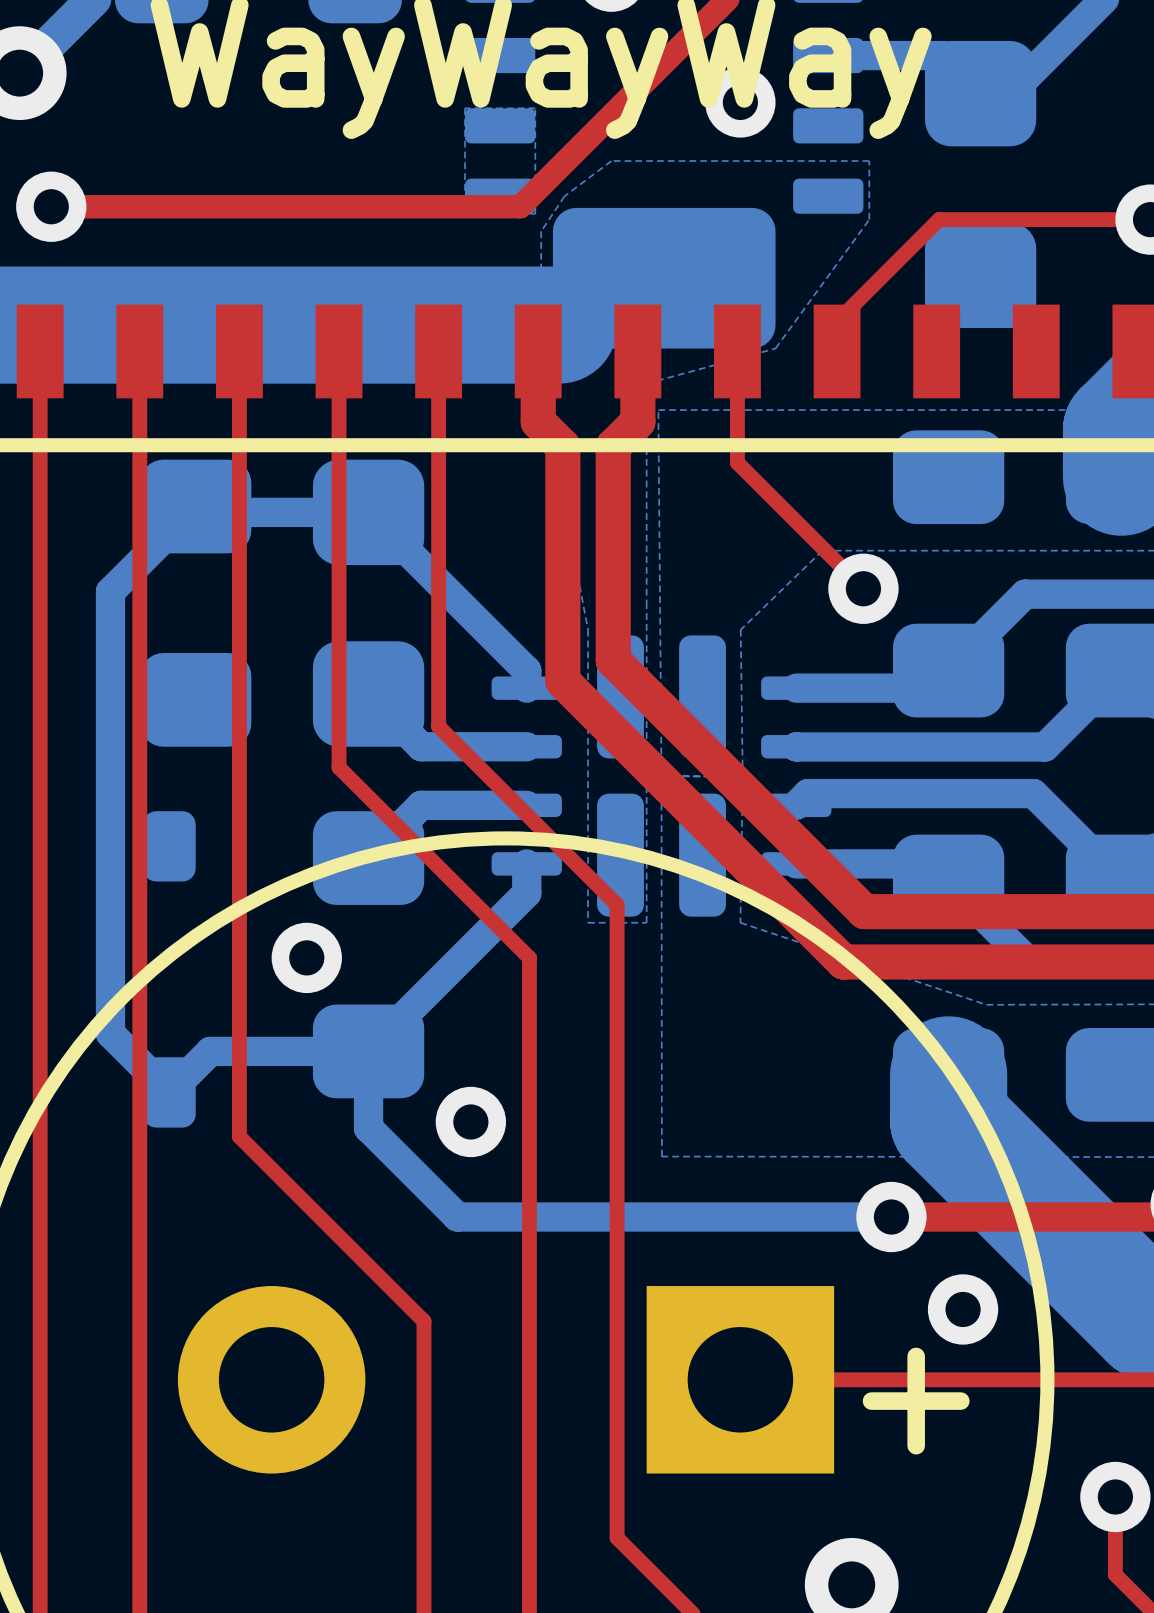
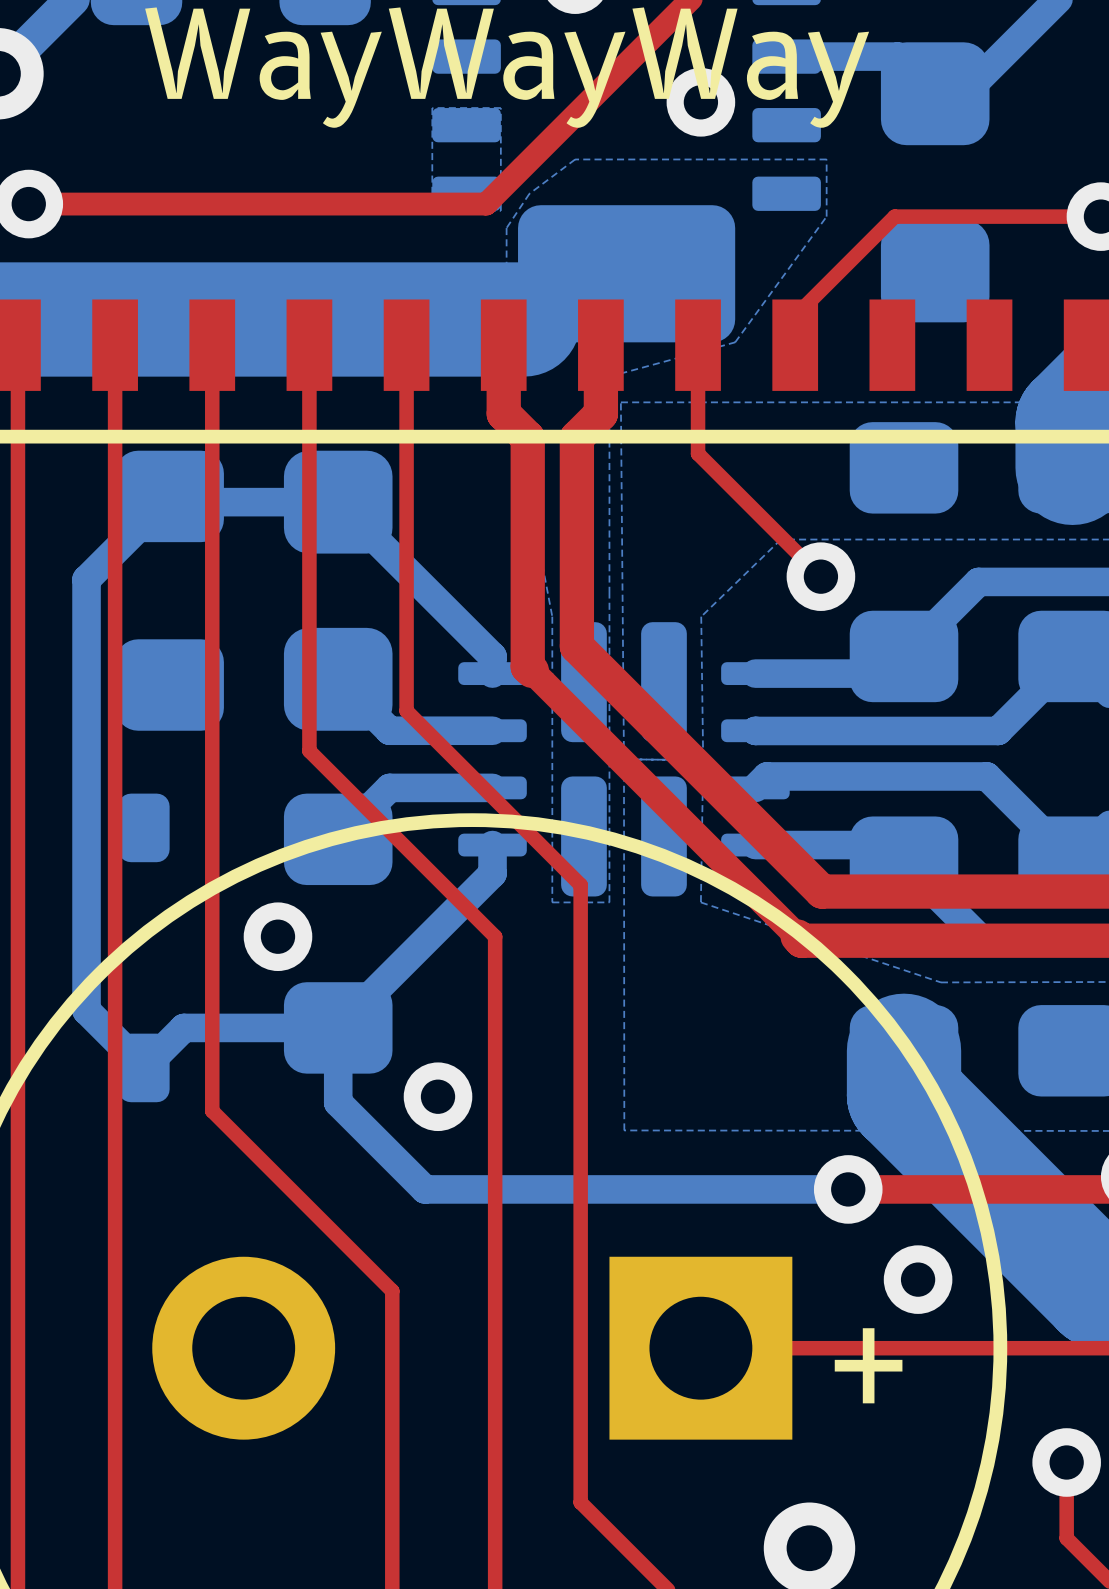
top track width: thick (562, 681) (843, 962) -> thin (527, 666) (801, 940)

